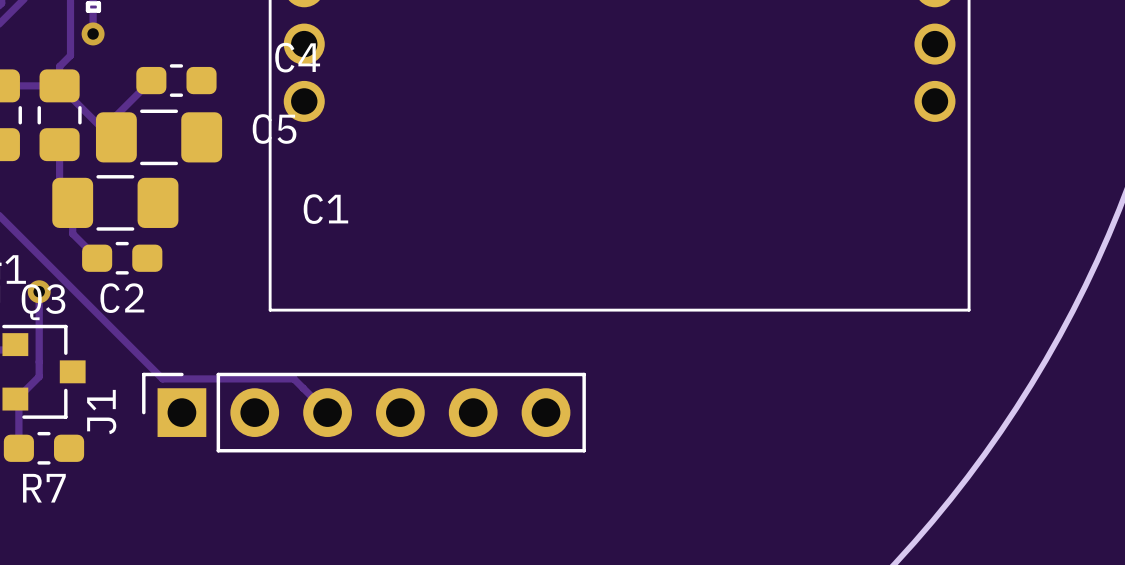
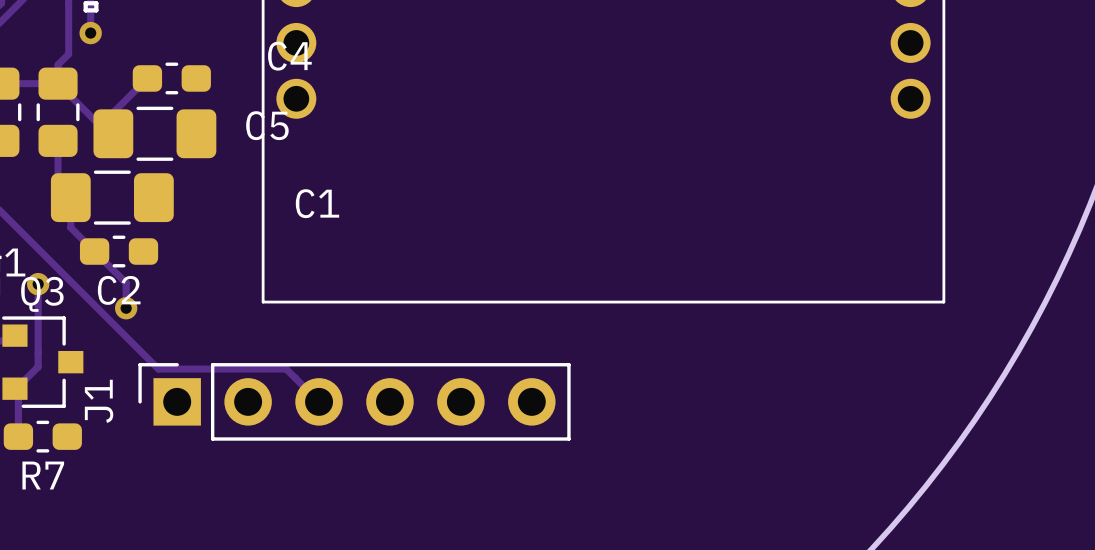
track: none -> (94, 251) (126, 283) (126, 308)
via: none -> (126, 308)

